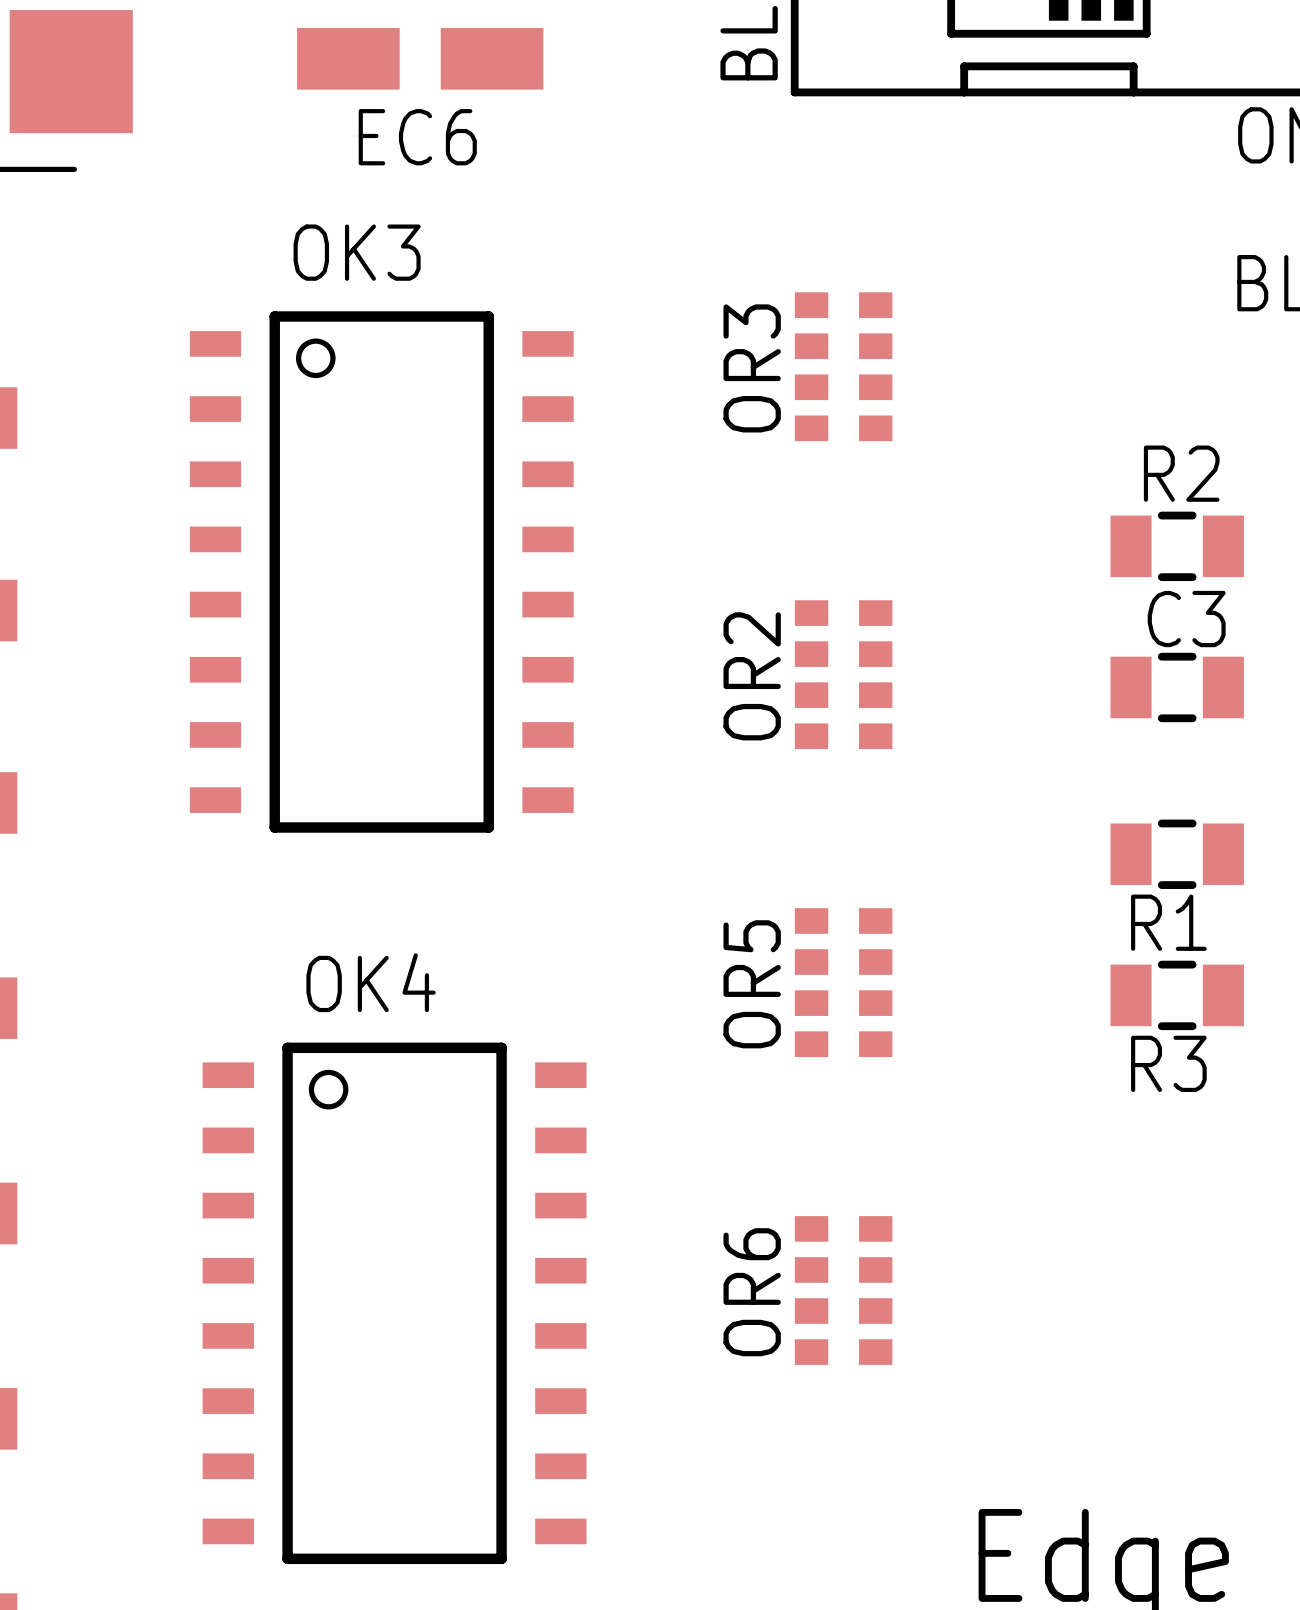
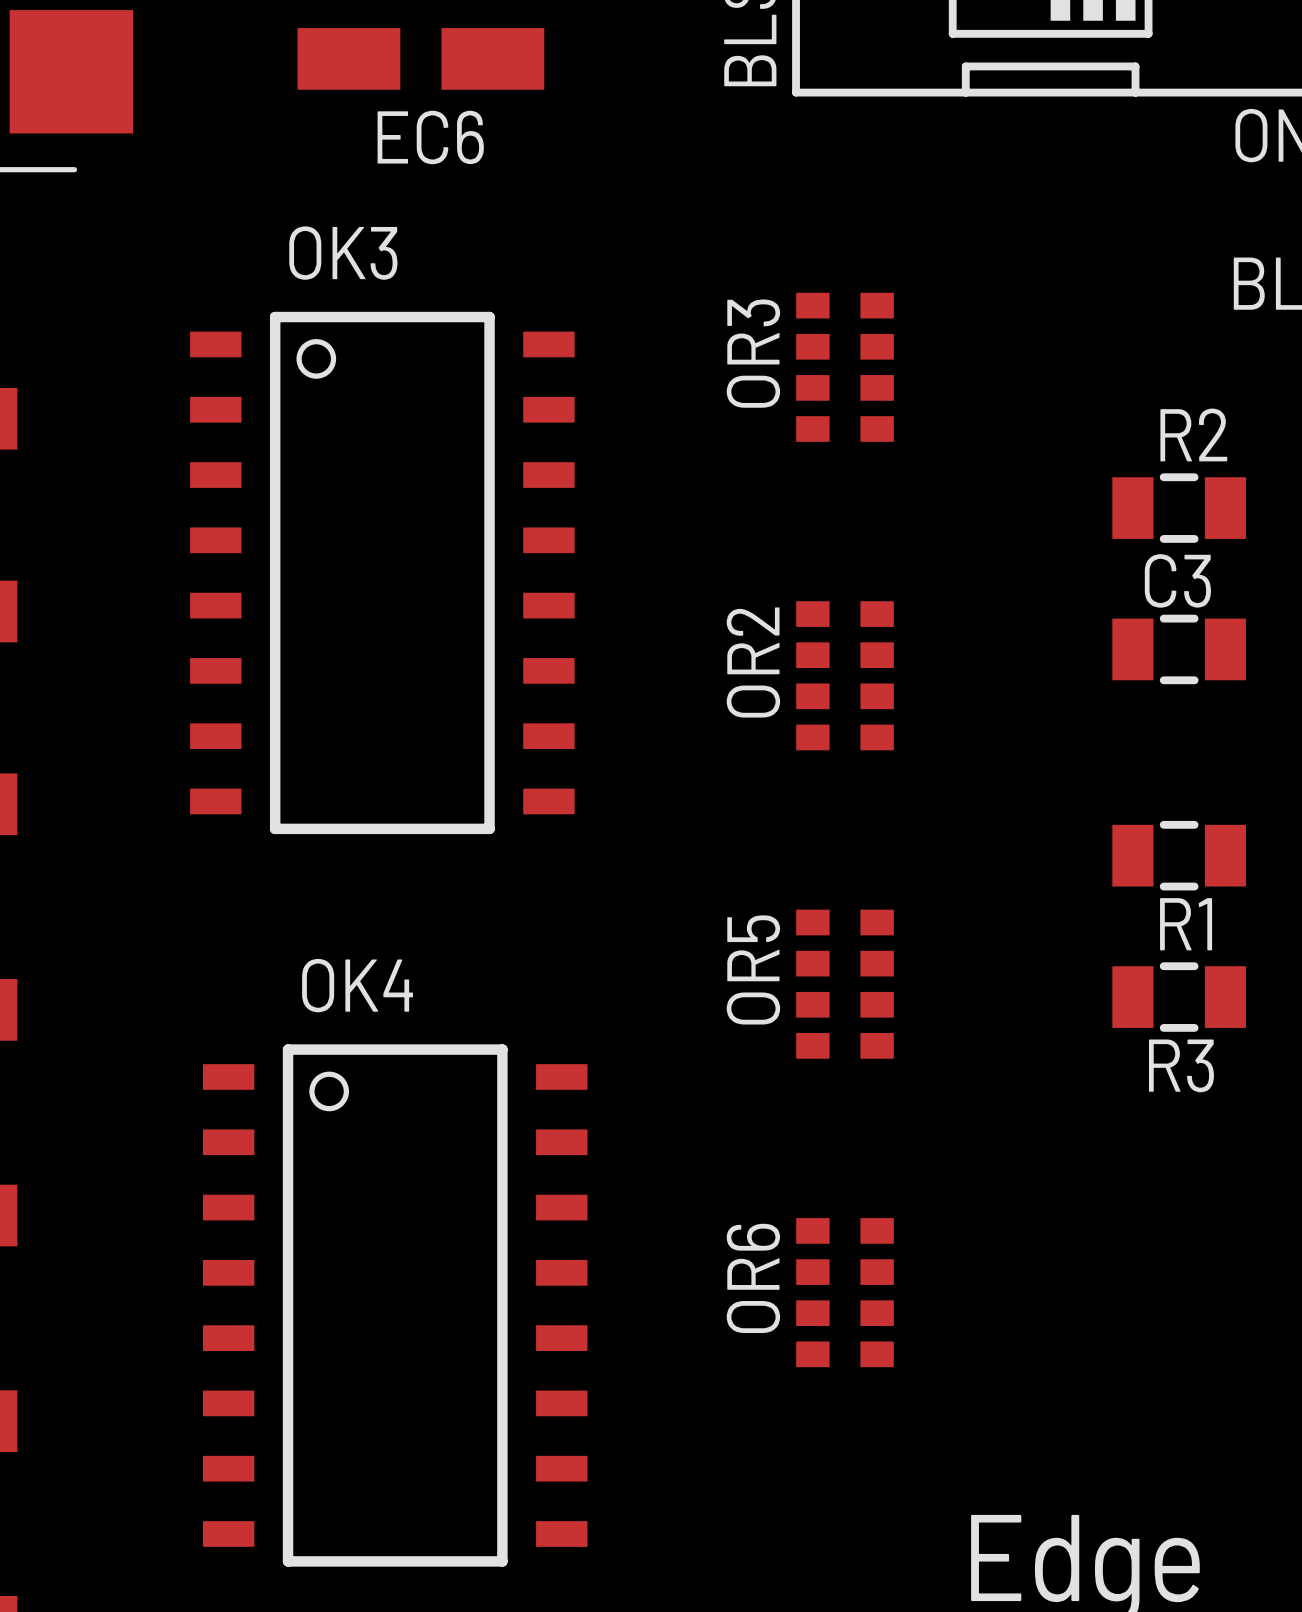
R2 position: (1177, 546) -> (1179, 508)
C3 position: (1177, 687) -> (1179, 649)

